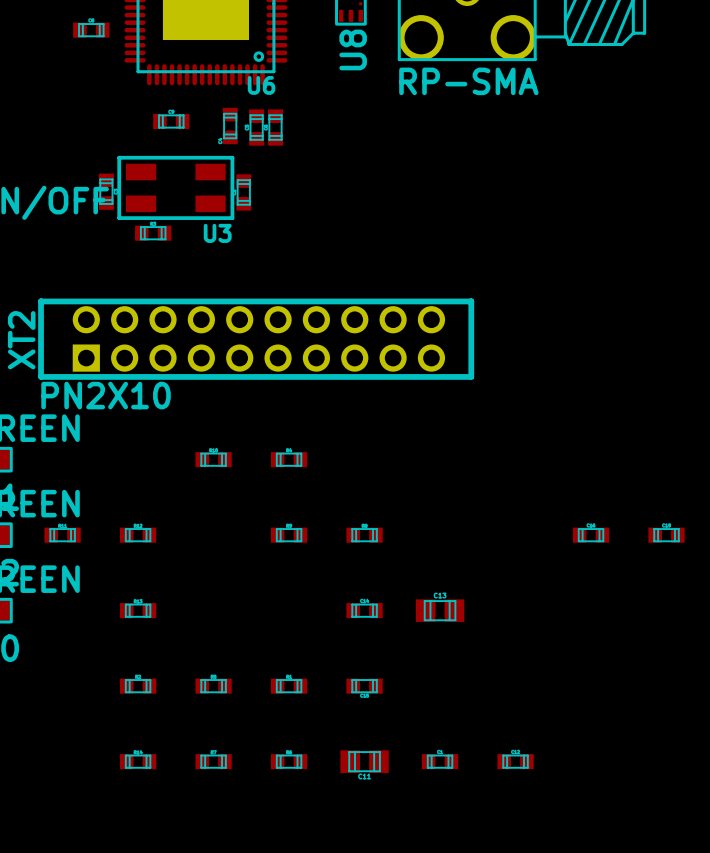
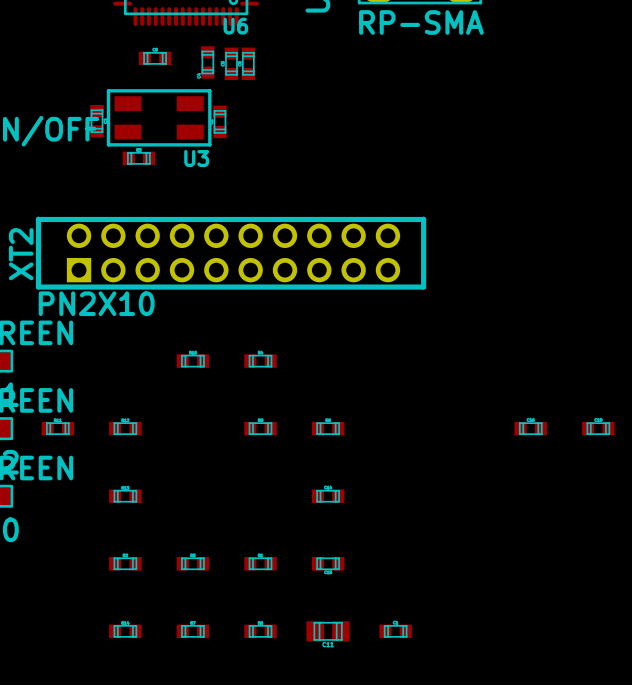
part: (440, 610) -> none
part: (515, 761) -> none

